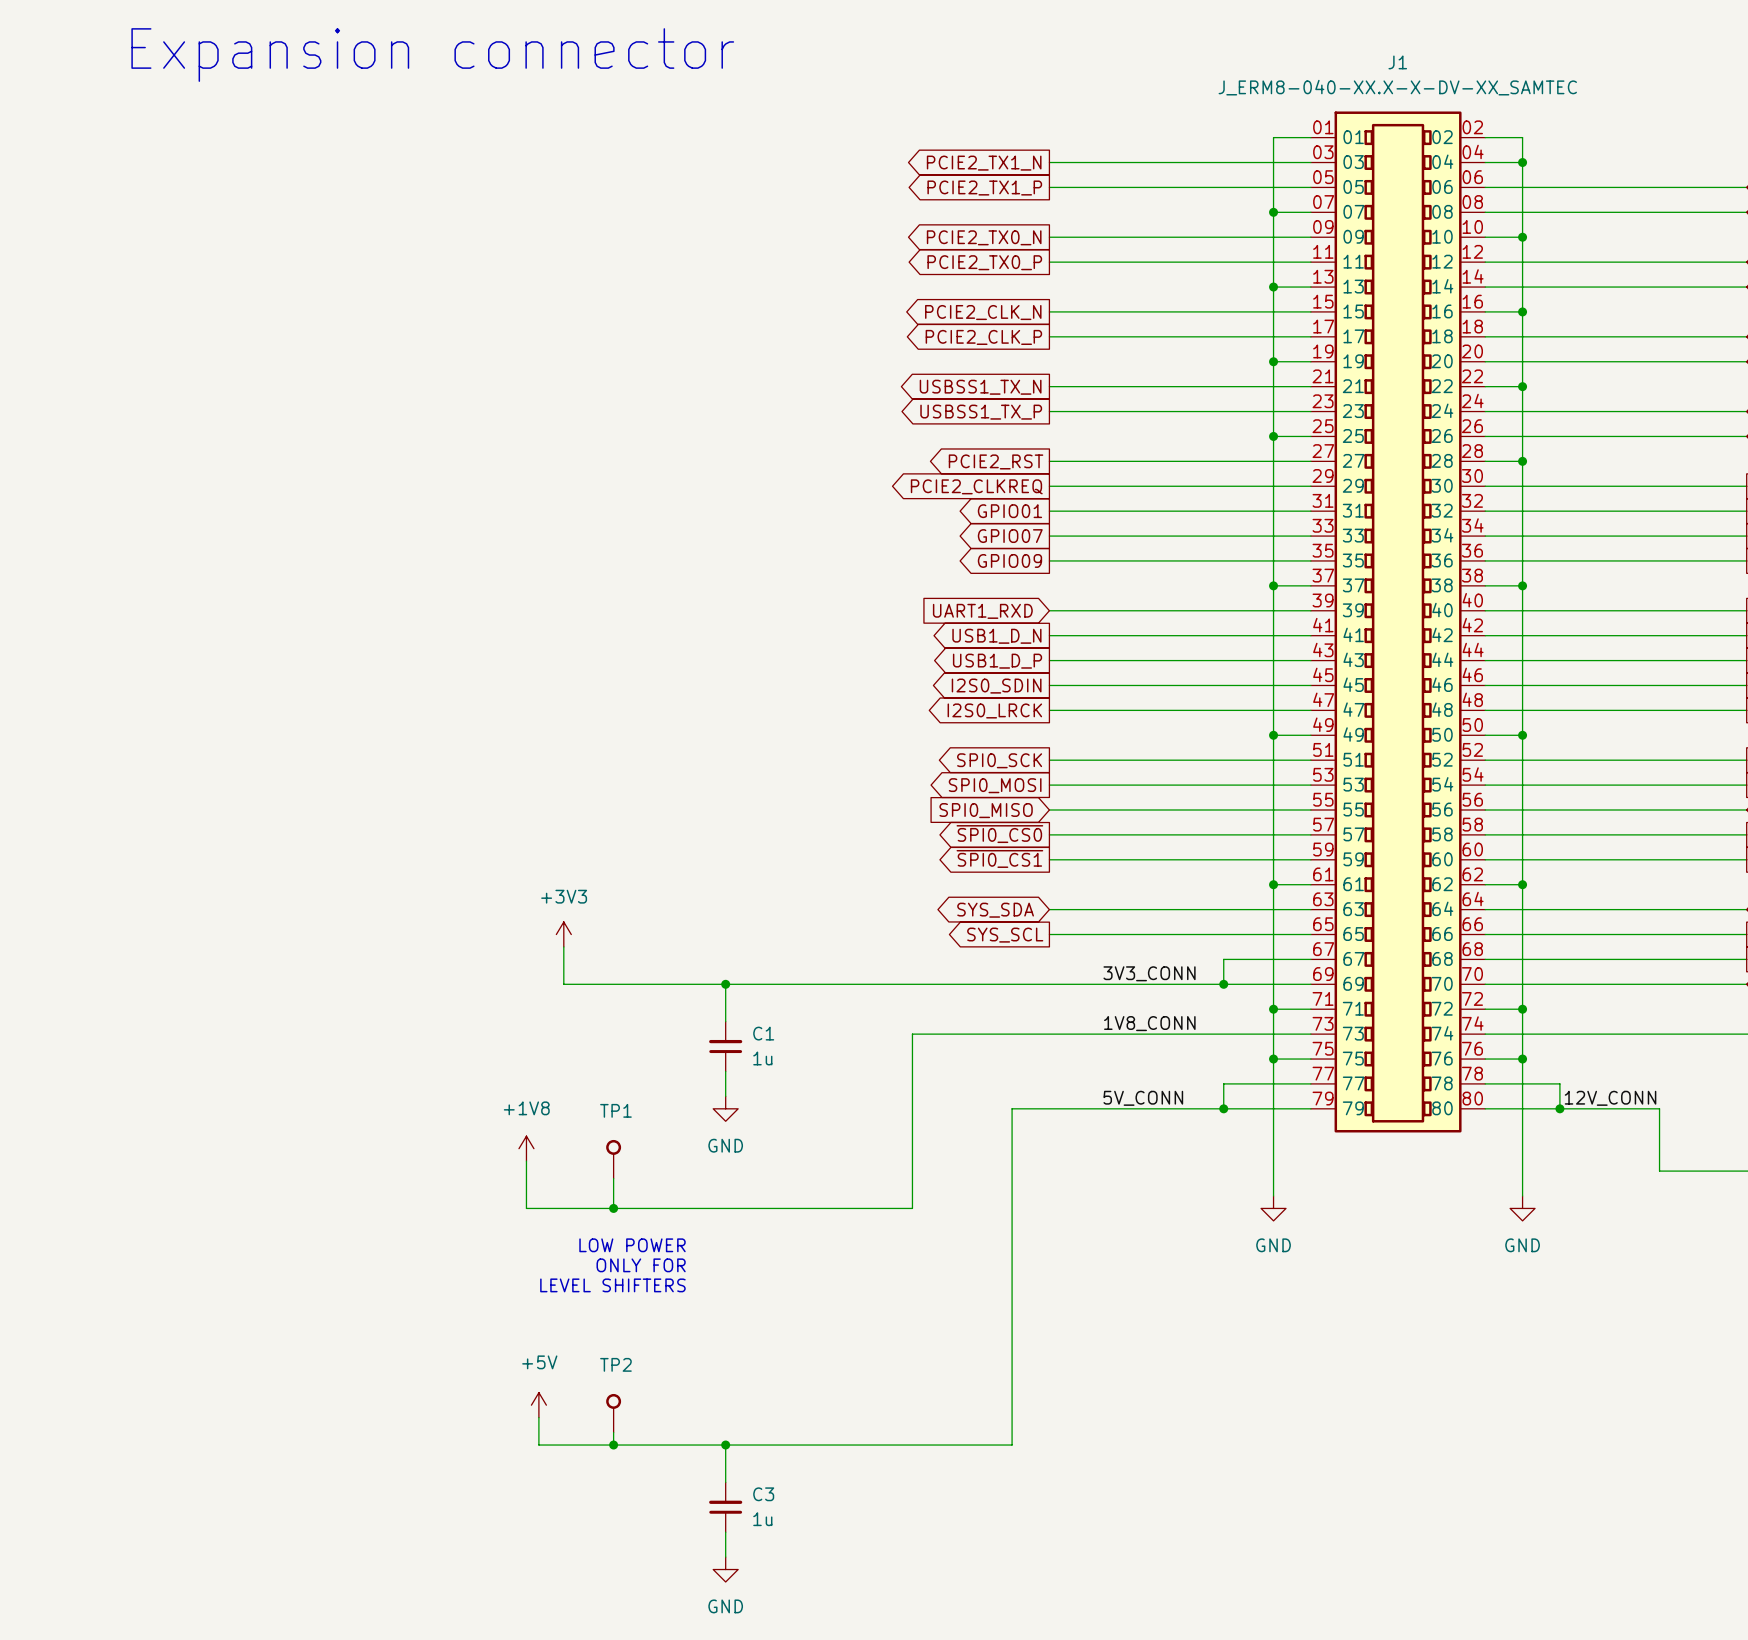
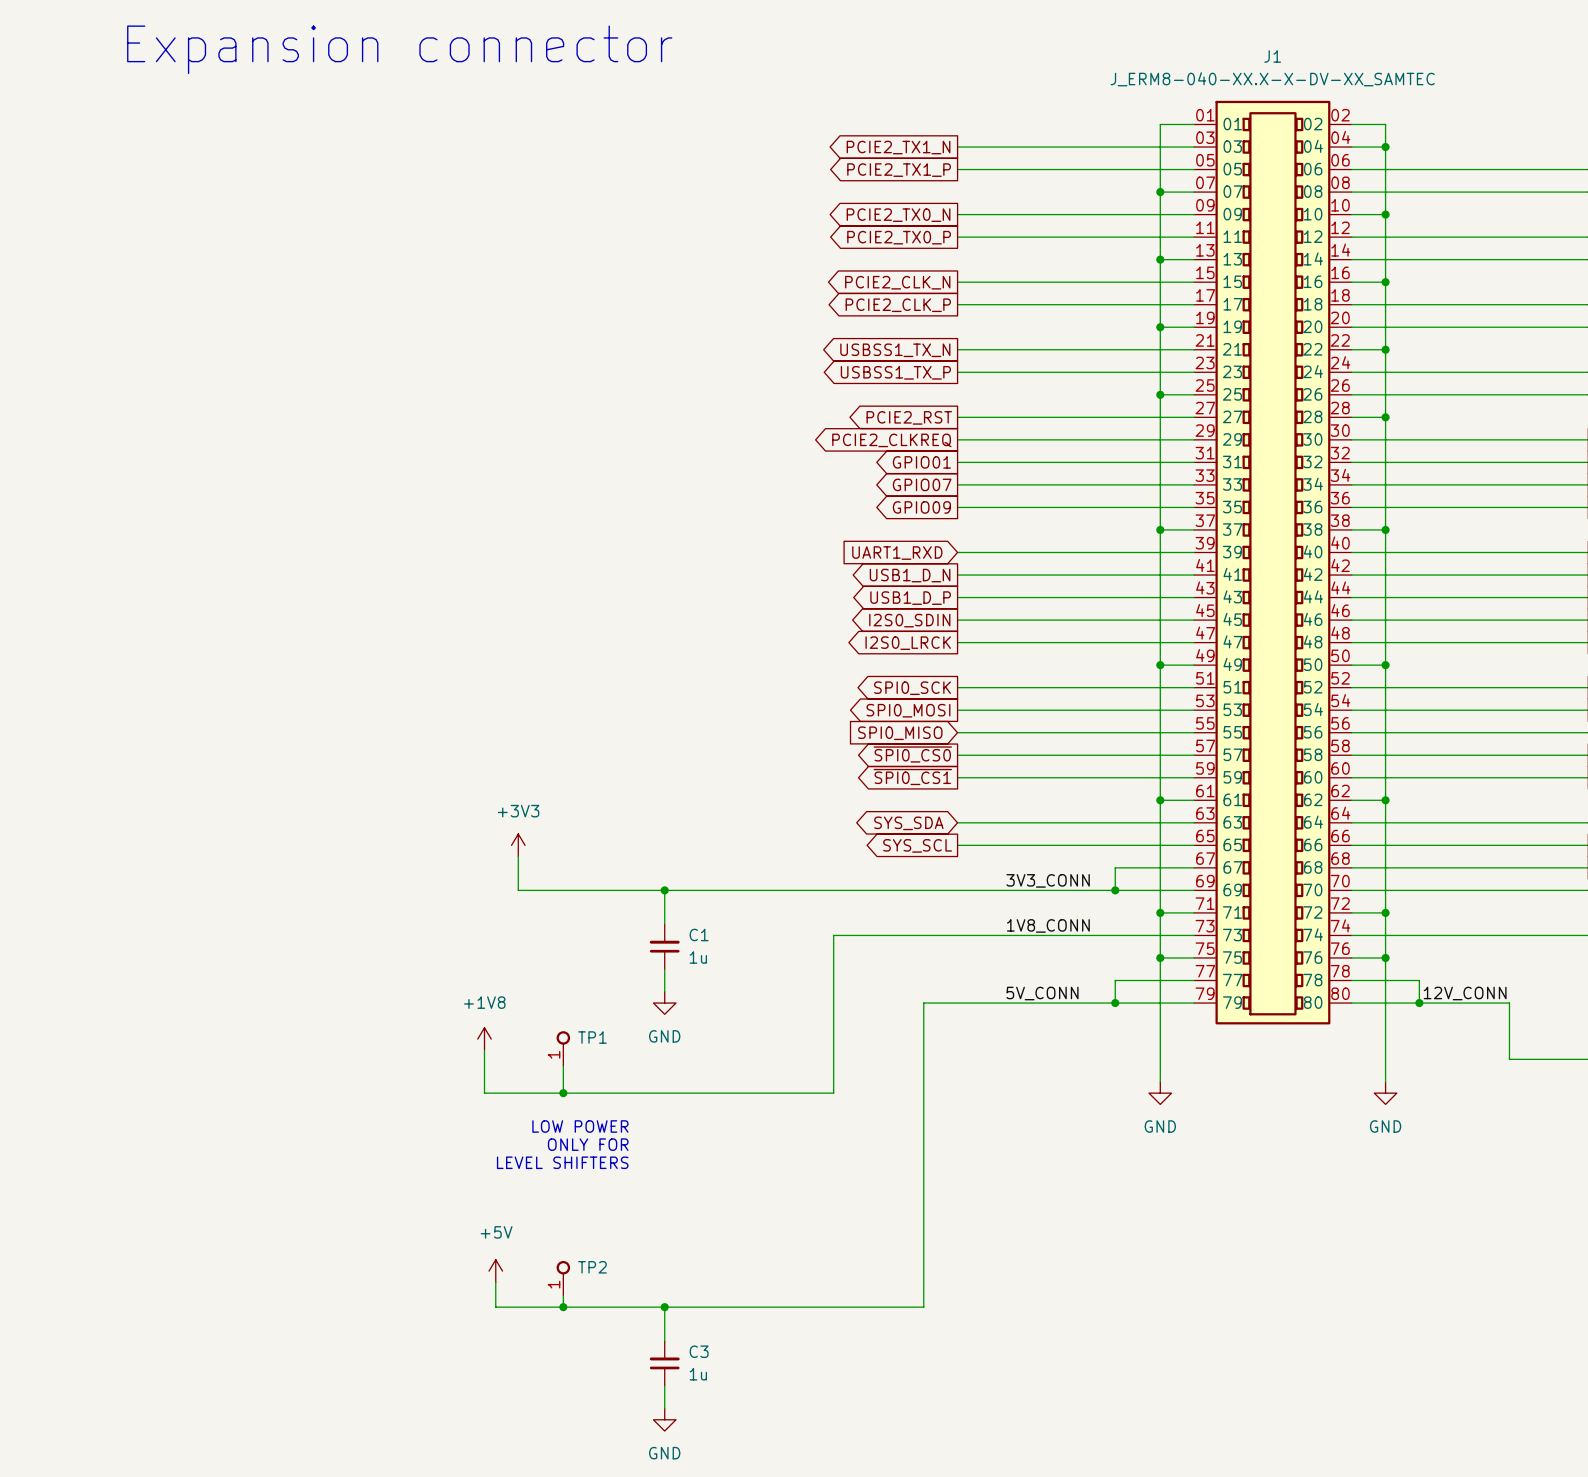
TP1 name position: TP1 (615, 1110) -> TP1 (592, 1037)
TP1 pin number: none -> 1 (554, 1054)
TP2 name position: TP2 (615, 1364) -> TP2 (592, 1267)
TP2 pin number: none -> 1 (554, 1284)

